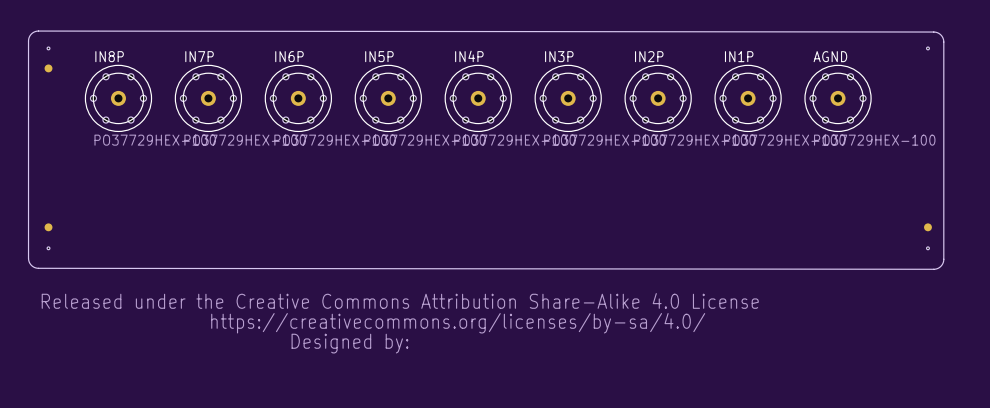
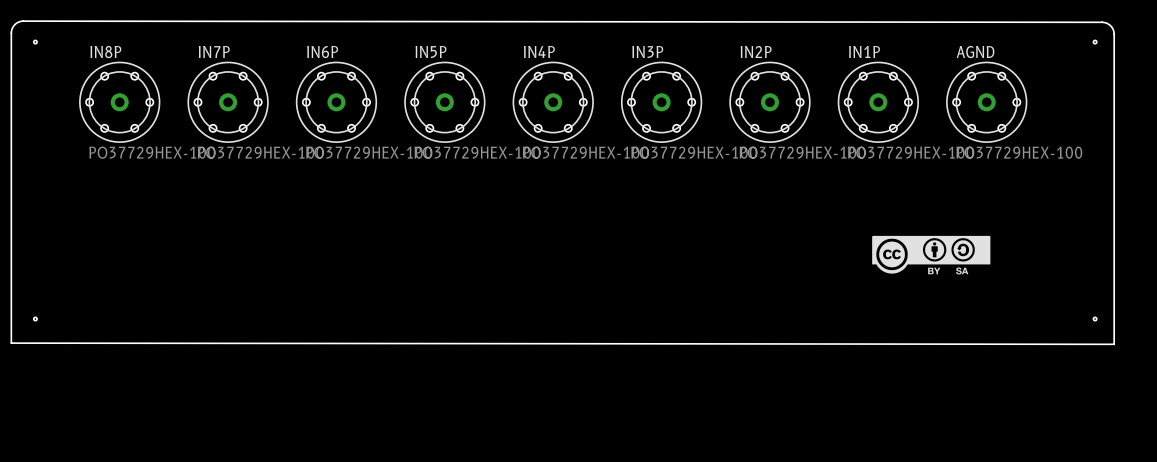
part: (48, 68) -> none
drawing: none -> [872, 235, 991, 275]
part: (48, 227) -> none
part: (927, 227) -> none
hole position: (48, 248) -> (35, 319)
hole position: (927, 248) -> (1095, 319)
board edge: (28, 258) (31, 265) (38, 268) (933, 269) (940, 266) (943, 259) -> (11, 294) (11, 343) (1114, 344) (1114, 296)
drawing: [41, 293, 759, 354] -> none

